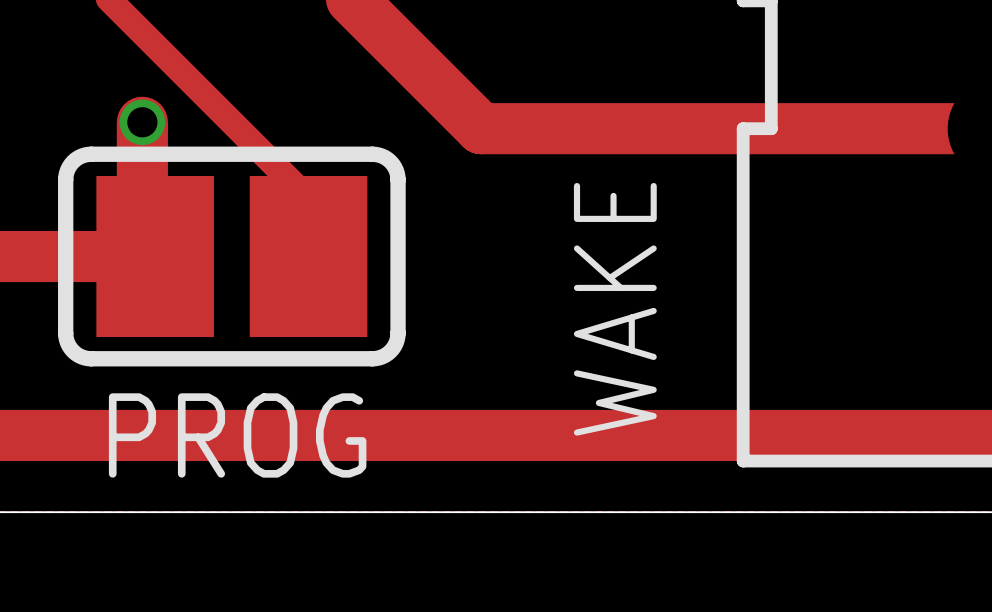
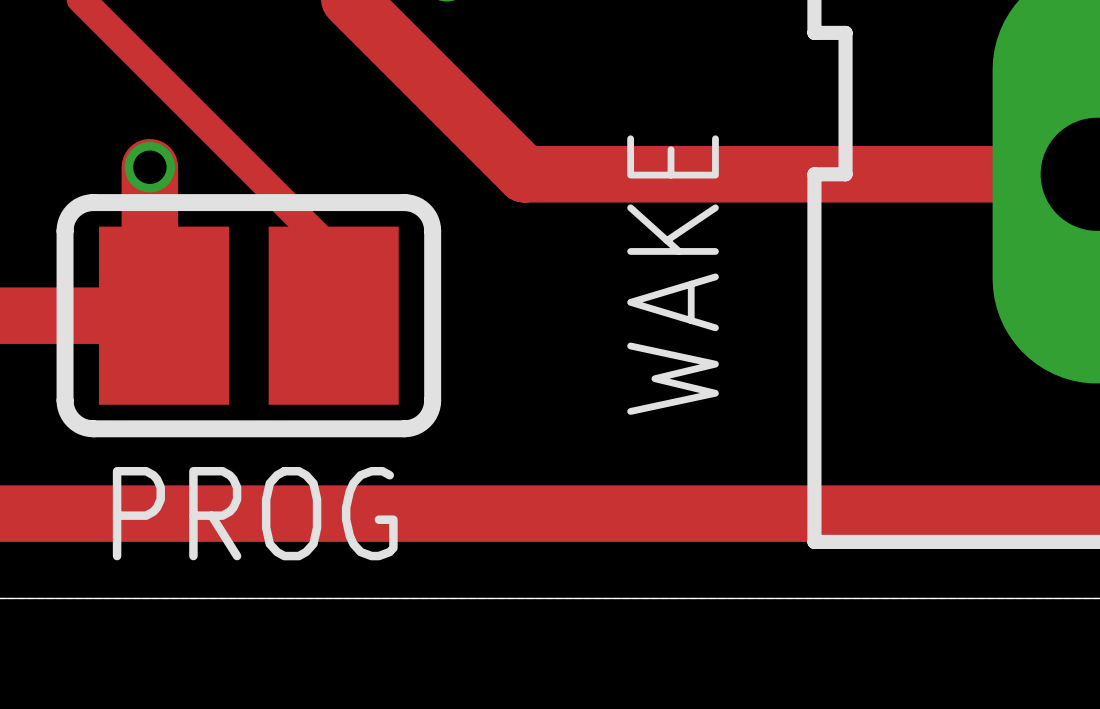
WAKE name position: WAKE (615, 309) -> WAKE (673, 275)

